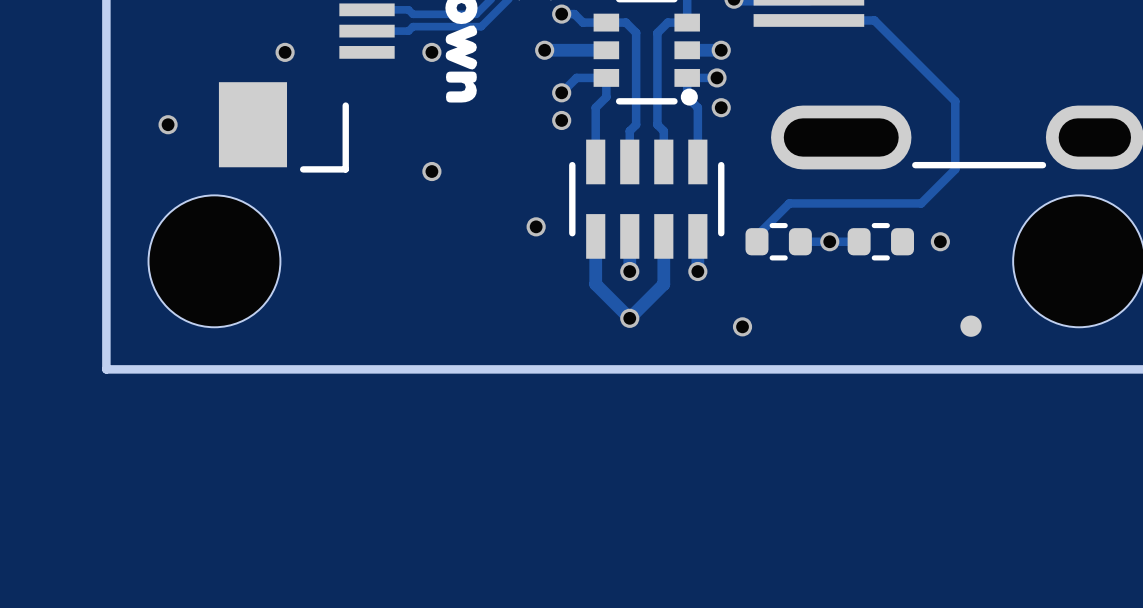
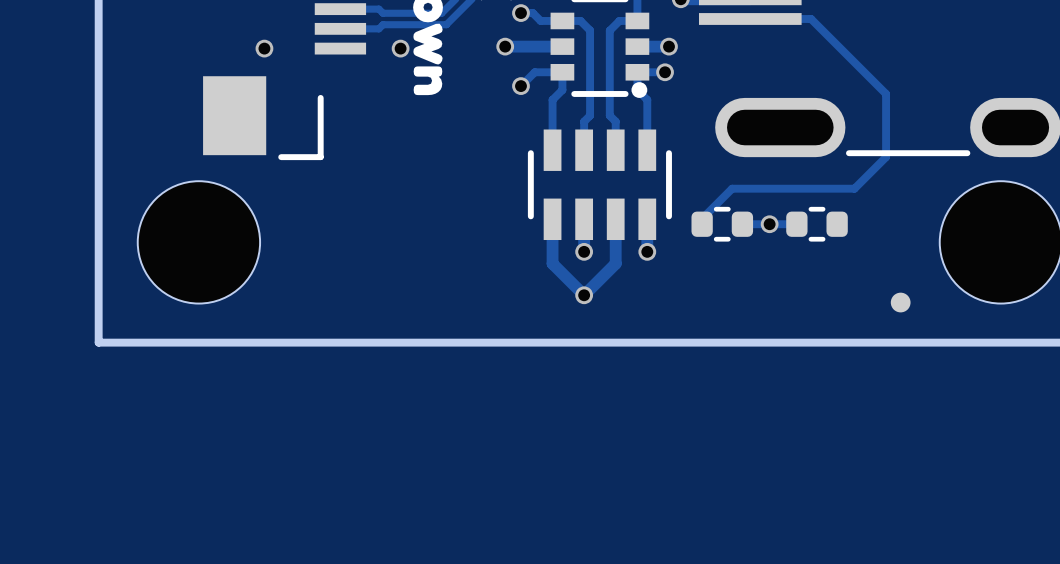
via: (721, 107) -> none
via: (561, 120) -> none
via: (168, 124) -> none
via: (431, 171) -> none
via: (536, 226) -> none
via: (940, 241) -> none
via: (742, 326) -> none

